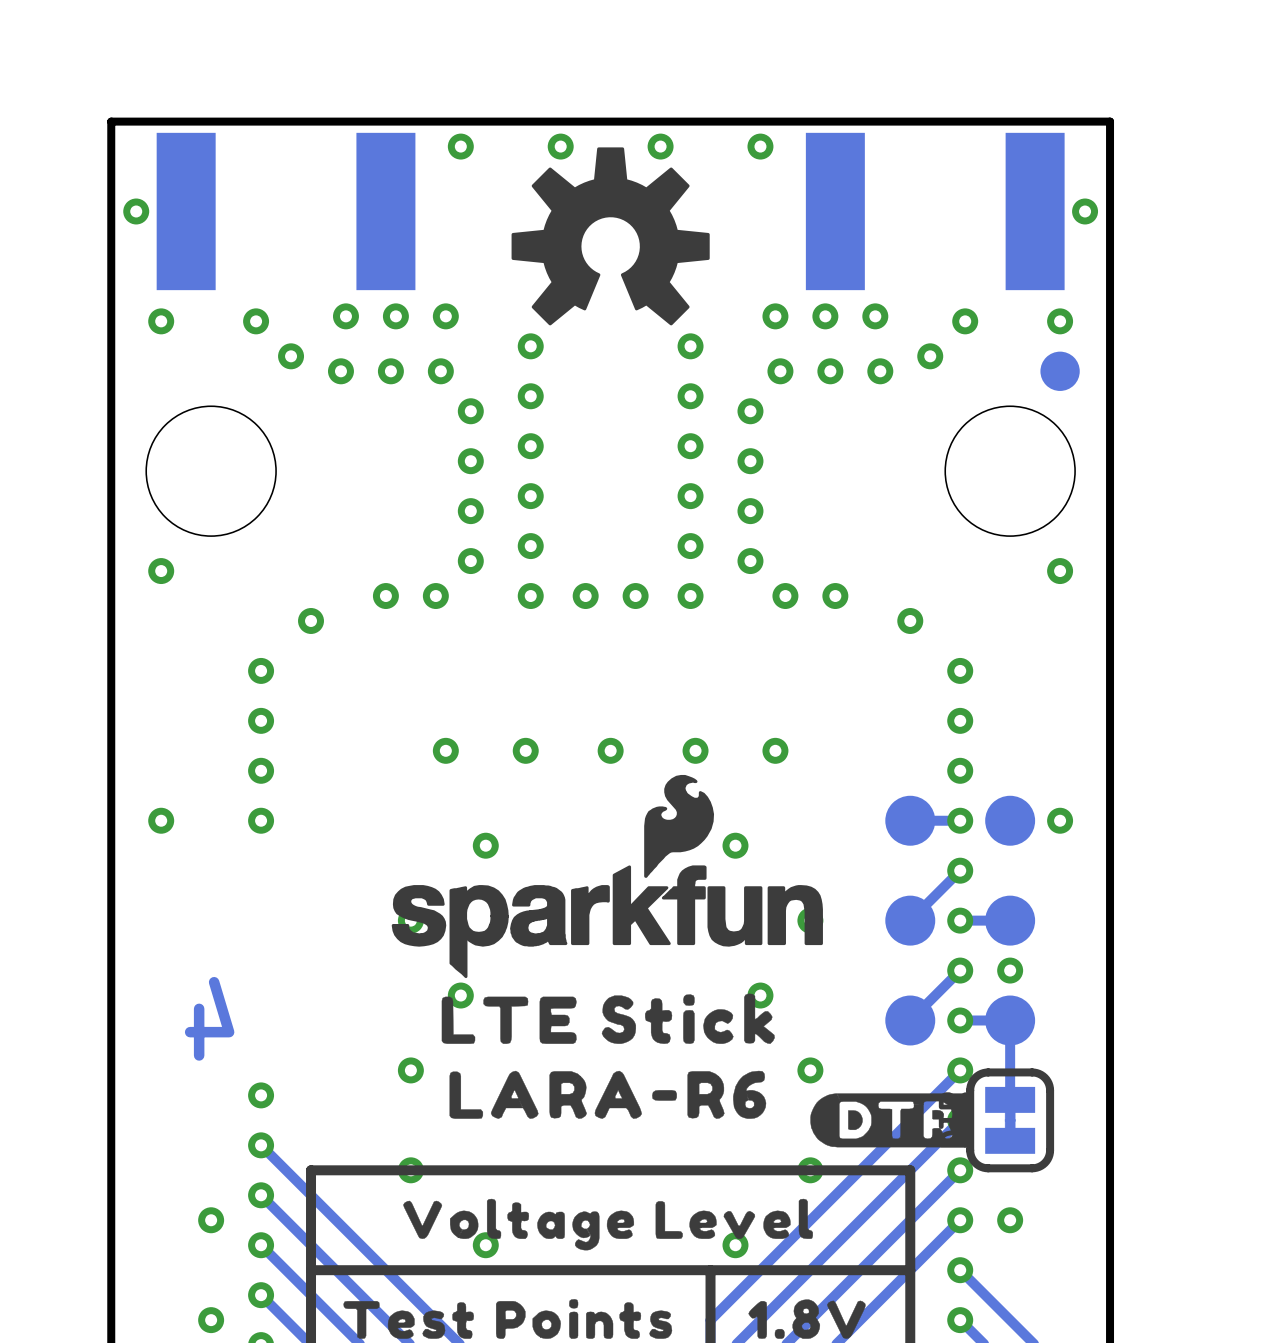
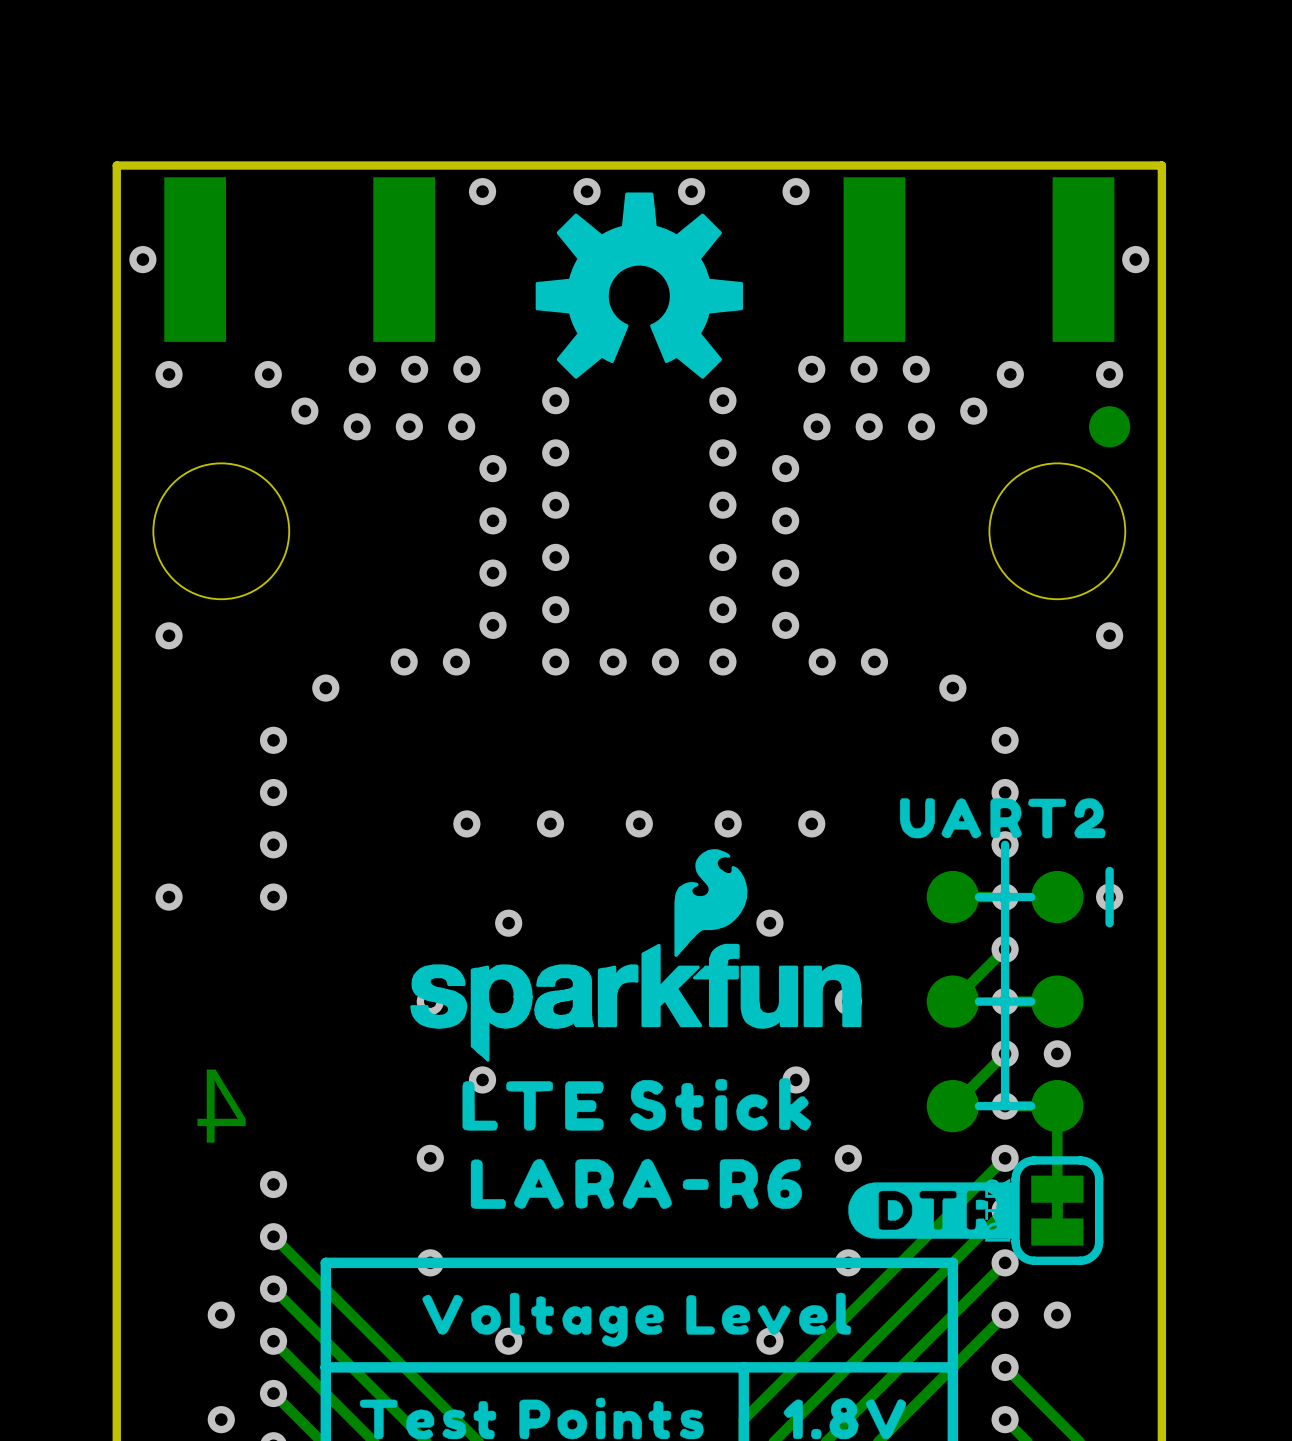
drawing: none -> [899, 798, 1106, 839]
line: none -> (1005, 844) (1005, 1106)
line: none -> (1109, 870) (1109, 923)
line: none -> (1031, 897) (978, 897)
line: none -> (1031, 1001) (978, 1001)
line: none -> (1031, 1106) (978, 1106)

